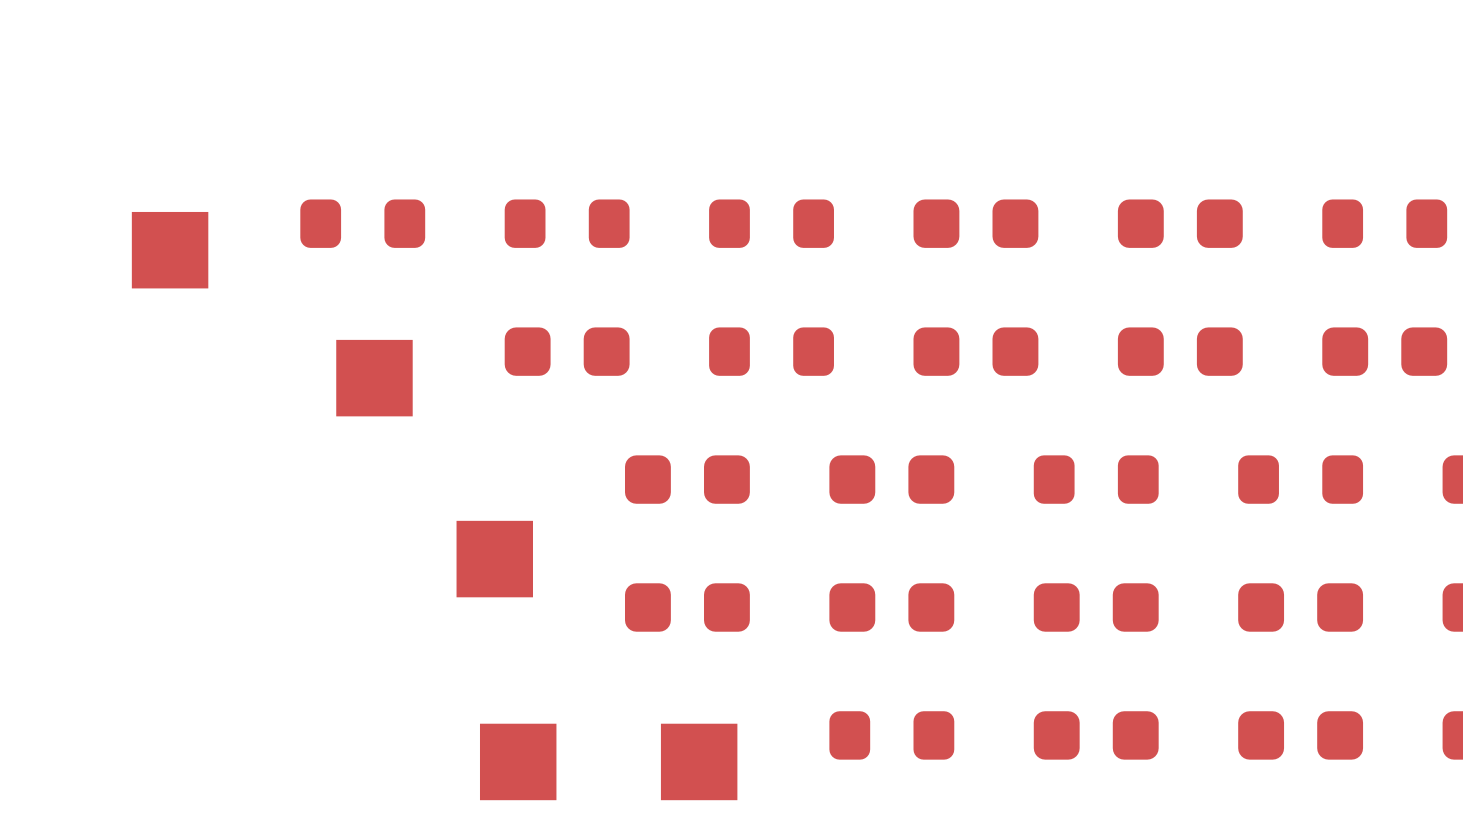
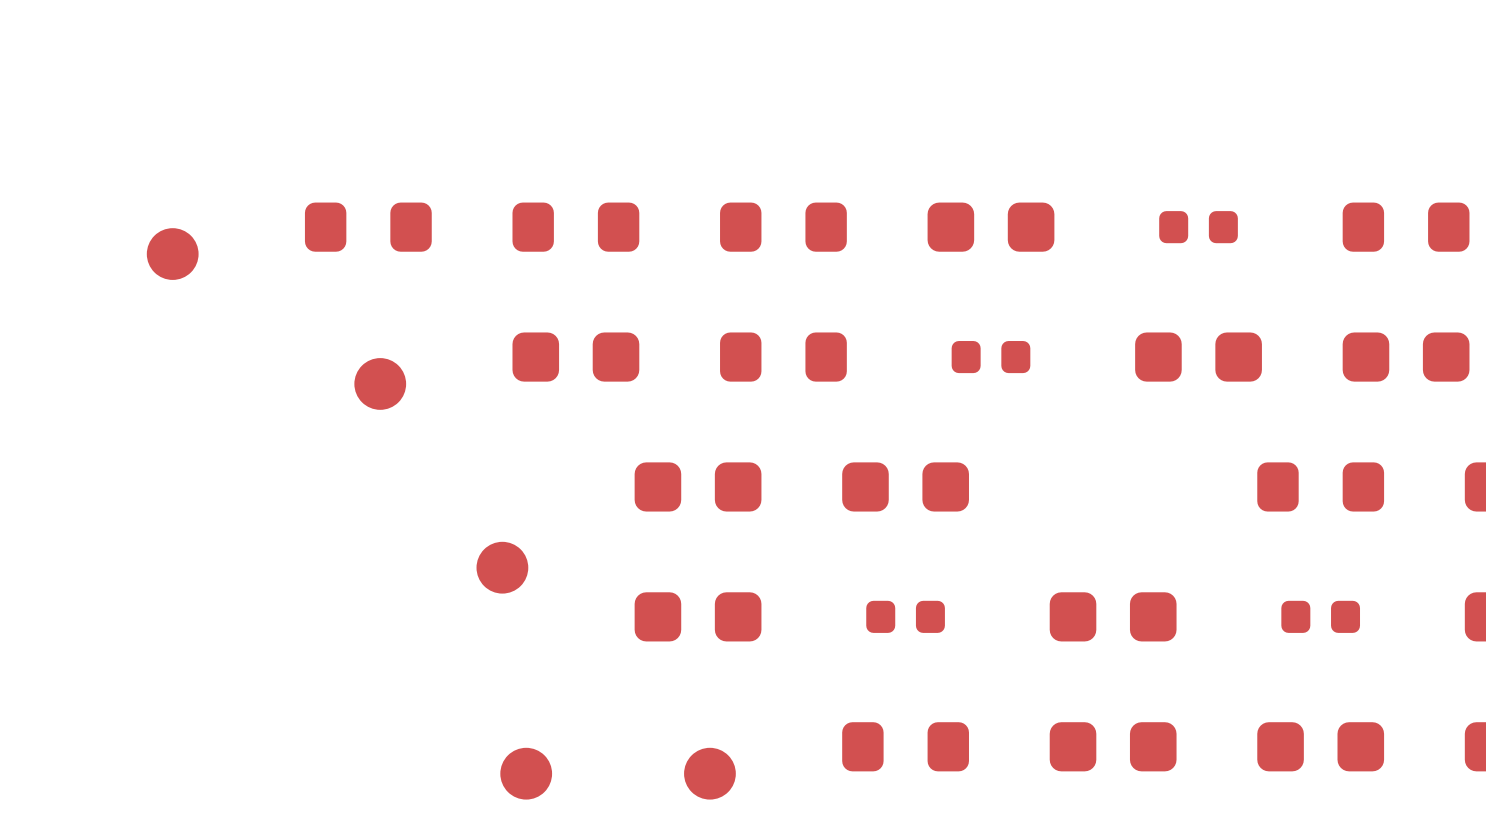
part footprint: [1117, 199, 1243, 248] -> [1159, 211, 1238, 244]
part footprint: [131, 211, 209, 289] -> [146, 228, 199, 280]
part footprint: [913, 327, 1039, 376] -> [951, 341, 1031, 374]
part footprint: [336, 339, 413, 417] -> [354, 358, 407, 410]
part: (1096, 479) -> none
part footprint: [456, 520, 533, 598] -> [476, 541, 529, 594]
part footprint: [829, 583, 955, 632] -> [866, 600, 945, 633]
part footprint: [1238, 583, 1364, 632] -> [1281, 600, 1361, 633]
part footprint: [479, 723, 557, 801] -> [500, 747, 553, 800]
part footprint: [660, 723, 738, 801] -> [684, 747, 736, 800]

